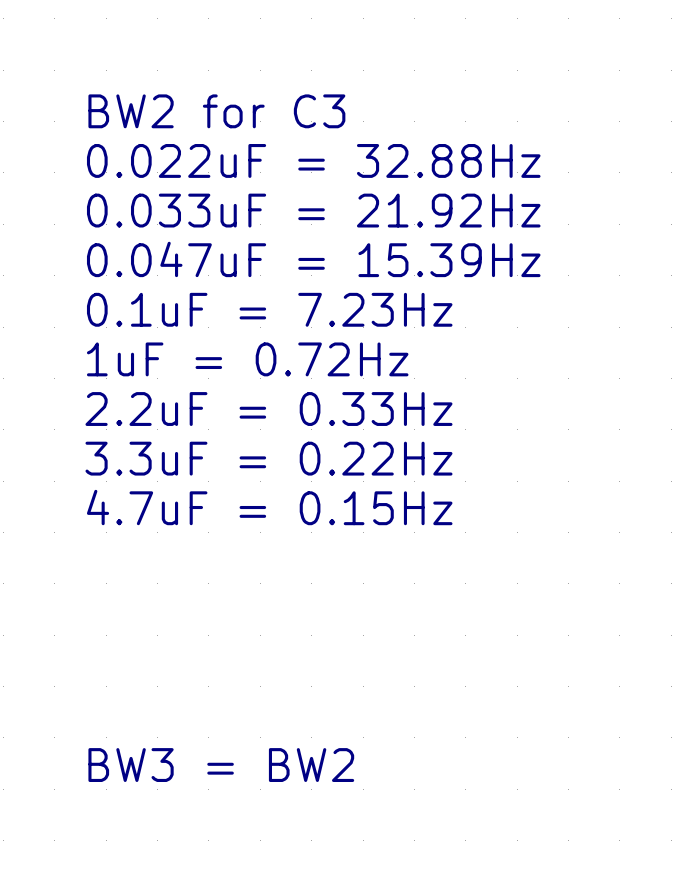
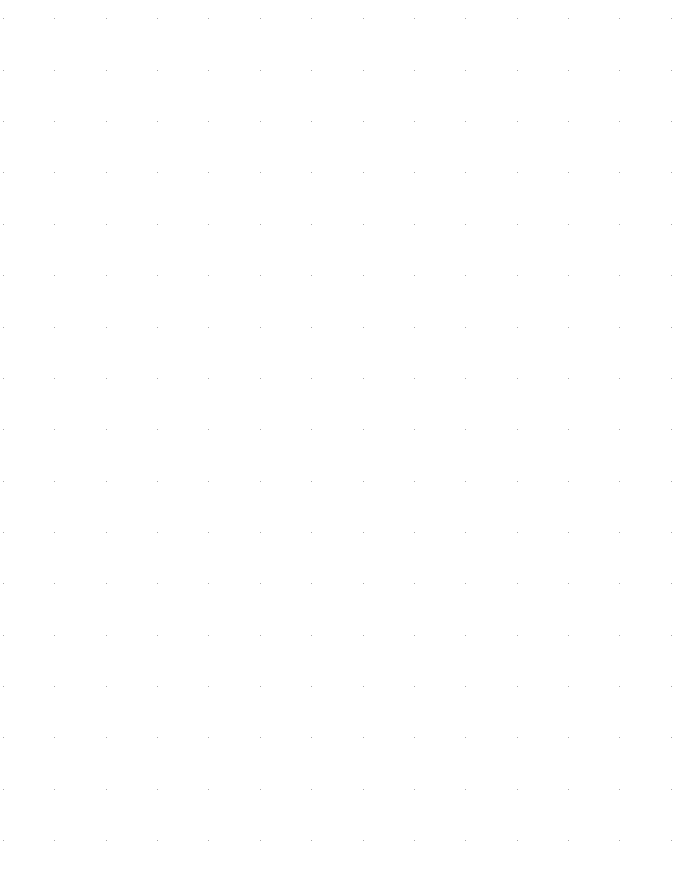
text: BW2 for C3 (216, 111) -> none
text: 0.022uF = 32.88Hz (313, 160) -> none
text: 0.033uF = 21.92Hz (313, 210) -> none
text: 0.047uF = 15.39Hz (313, 259) -> none
text: 0.1uF = 7.23Hz (269, 309) -> none
text: 1uF = 0.72Hz (247, 359) -> none
text: 2.2uF = 0.33Hz (268, 409) -> none
text: 3.3uF = 0.22Hz (268, 458) -> none
text: 4.7uF = 0.15Hz (269, 507) -> none
text: BW3 = BW2 (221, 765) -> none

